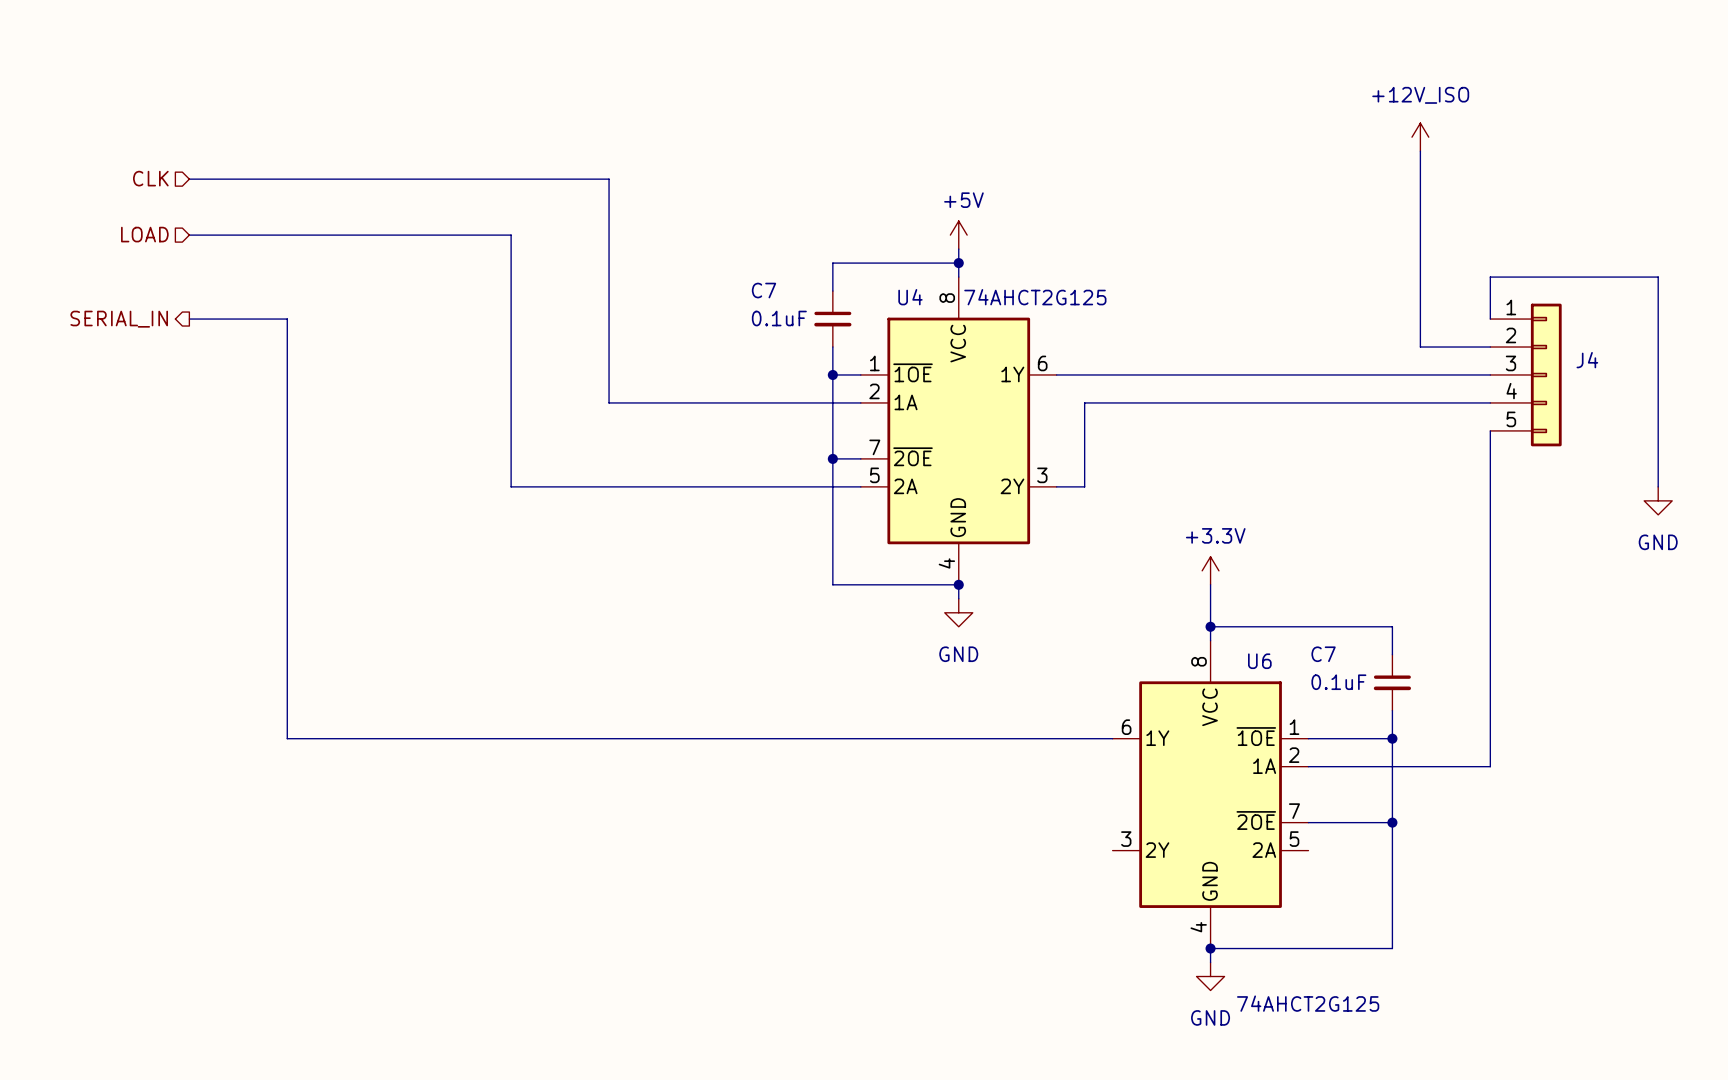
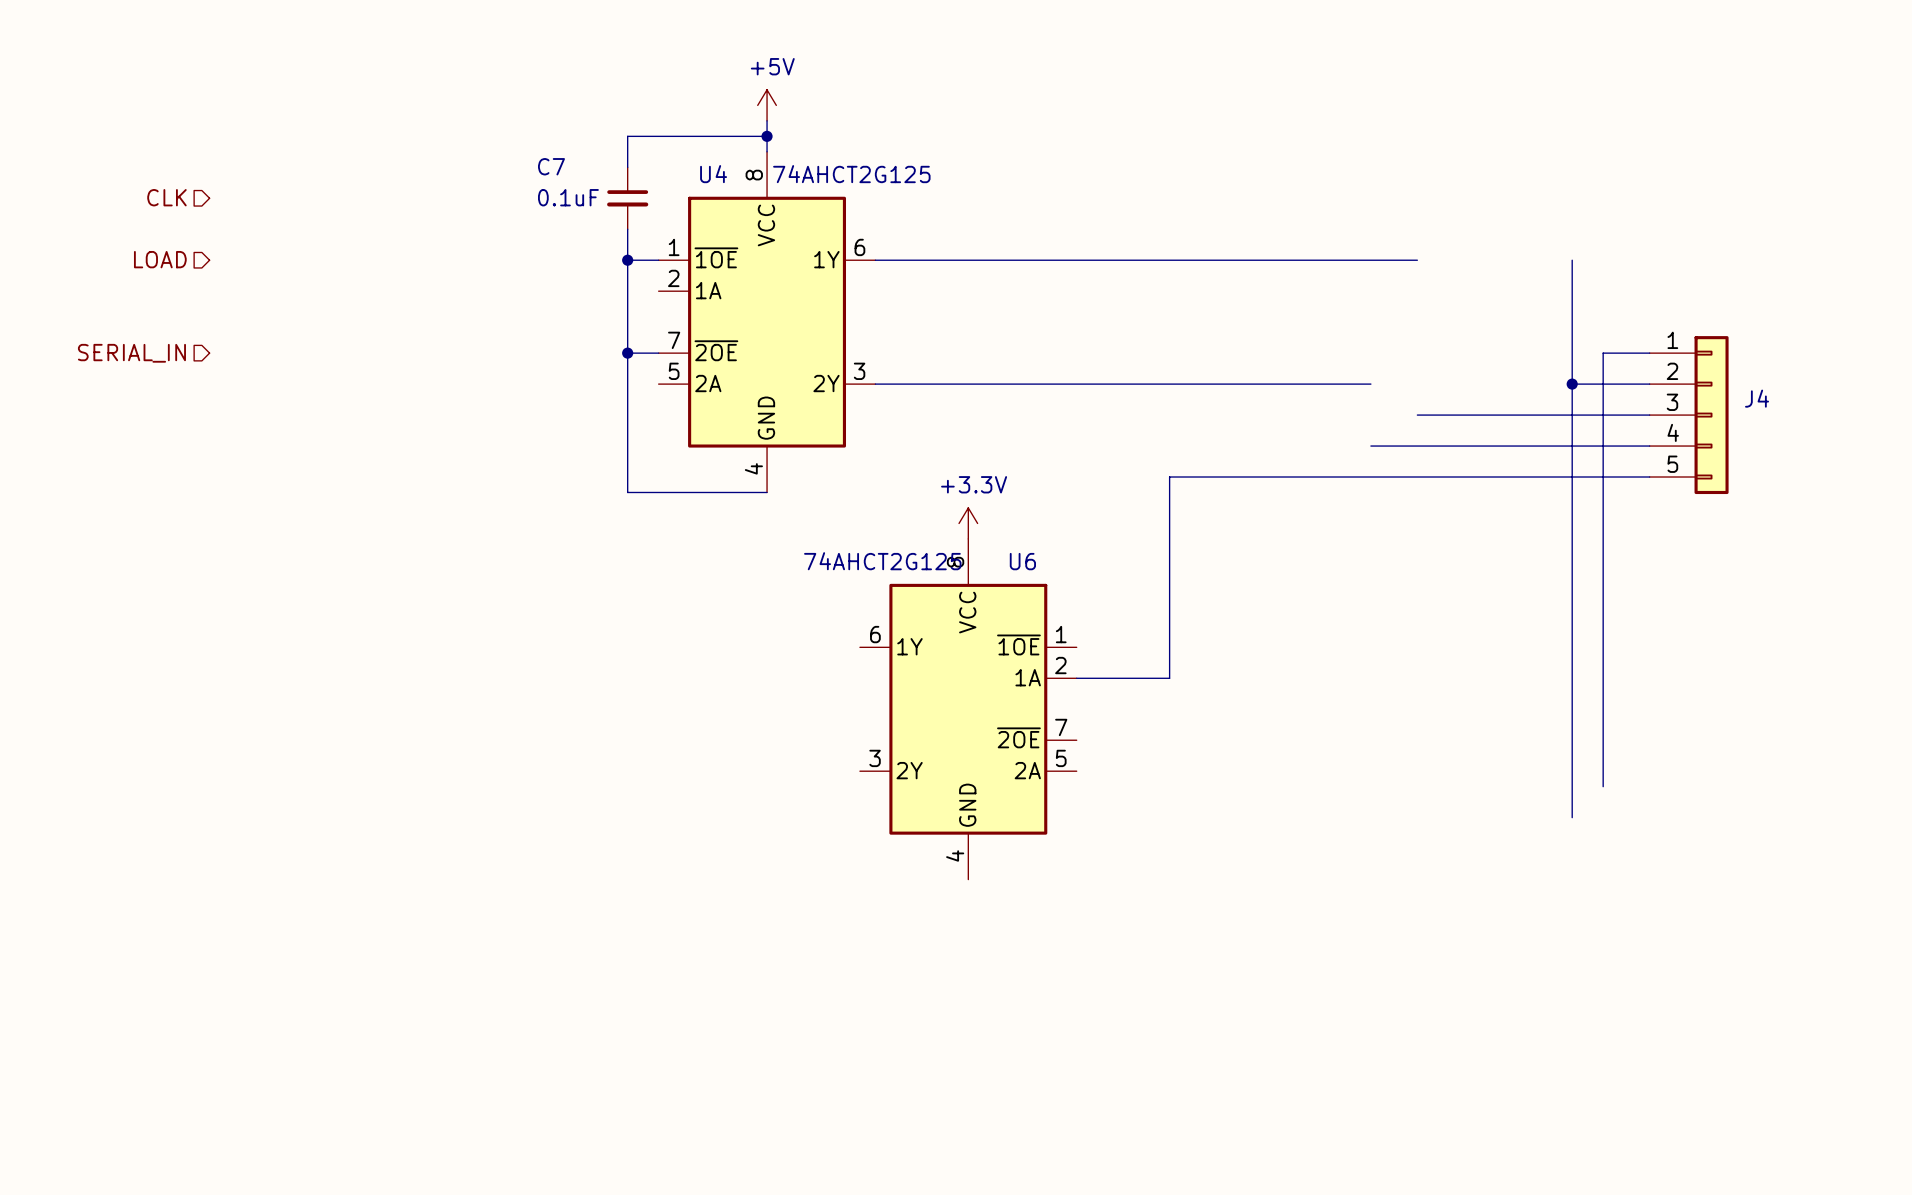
power symbol: none -> +5V (767, 105)
wire: none -> (767, 120) (767, 151)
wire: none -> (767, 136) (627, 136) (627, 167)
junction: none -> (767, 136)
power symbol: +12V_ISO (1420, 137) -> none
wire: (1420, 151) (1420, 235) -> none
wire: (189, 179) (609, 179) (609, 402) (860, 402) -> none
C7: none -> 0.1uF (627, 198)
wire: none -> (627, 229) (627, 492) (767, 492)
wire: (189, 235) (511, 235) (511, 486) (860, 486) -> none
wire: none -> (627, 260) (658, 260)
junction: none -> (627, 260)
wire: none -> (875, 260) (1417, 260)
power symbol: +5V (958, 235) -> none
wire: (958, 249) (958, 277) -> none
wire: (958, 263) (832, 263) (832, 291) -> none
junction: (958, 263) -> none
hierarchical label shape: output (119, 319) -> input (131, 353)
wire: (189, 319) (287, 319) (287, 738) (1112, 738) -> none
junction: none -> (627, 353)
C7: 0.1uF (832, 319) -> none
wire: (1490, 319) (1490, 277) (1658, 277) (1658, 486) -> (1649, 353) (1603, 353) (1603, 786)
wire: none -> (875, 384) (1370, 384)
wire: (832, 347) (832, 584) (958, 584) (958, 598) -> none
wire: none -> (1572, 384) (1572, 817)
junction: none -> (1572, 384)
wire: (832, 374) (860, 374) -> (627, 353) (658, 353)
junction: (832, 374) -> none
wire: (1056, 374) (1280, 374) -> none
wire: (1238, 402) (1084, 402) (1084, 486) (1056, 486) -> none
U4 position: (958, 430) -> (767, 322)
wire: (1490, 430) (1490, 766) (1308, 766) -> (1649, 477) (1169, 477) (1169, 678) (1076, 678)
wire: (832, 458) (860, 458) -> none
junction: (832, 458) -> none
power symbol: none -> +3.3V (968, 523)
power symbol: GND (1658, 500) -> none
power symbol: +3.3V (1210, 570) -> none
junction: (958, 584) -> none
wire: (1210, 584) (1210, 640) -> none
power symbol: GND (958, 612) -> none
wire: (1210, 626) (1392, 626) (1392, 654) -> none
junction: (1210, 626) -> none
C7: 0.1uF (1392, 682) -> none
wire: (1392, 710) (1392, 948) (1210, 948) (1210, 962) -> none
wire: (1308, 738) (1392, 738) -> none
junction: (1392, 738) -> none
U6 position: (1210, 794) -> (968, 709)
wire: (1308, 822) (1392, 822) -> none
junction: (1392, 822) -> none
junction: (1210, 948) -> none
power symbol: GND (1210, 976) -> none
U6 value position: 74AHCT2G125 (1308, 1003) -> 74AHCT2G125 (882, 561)

